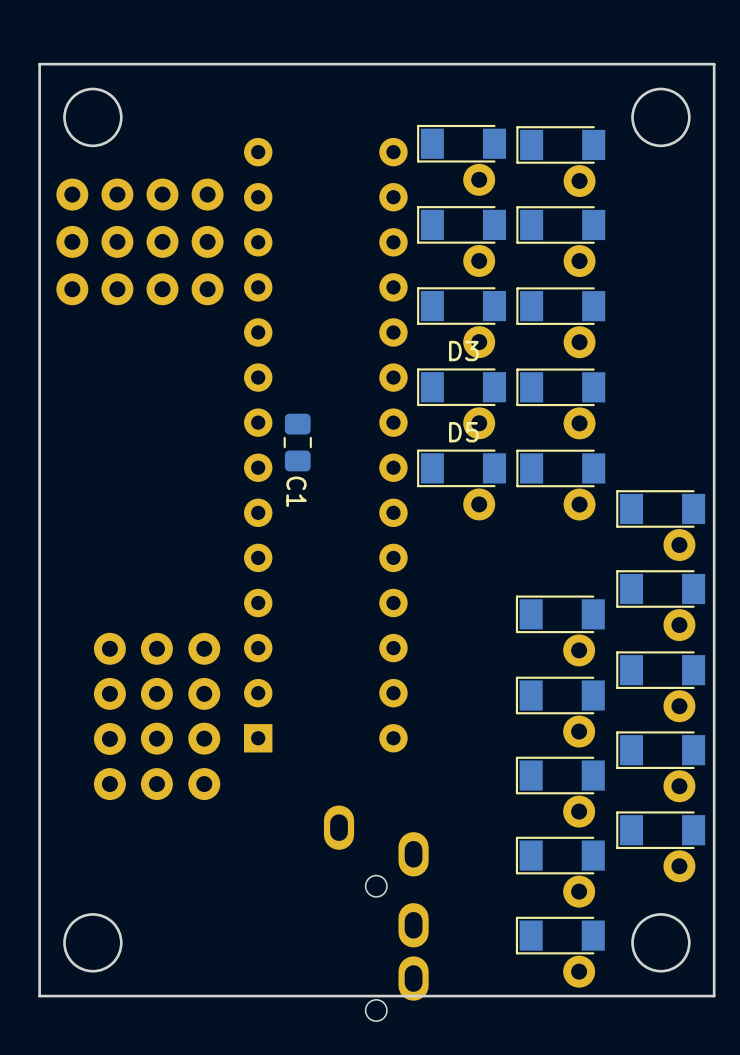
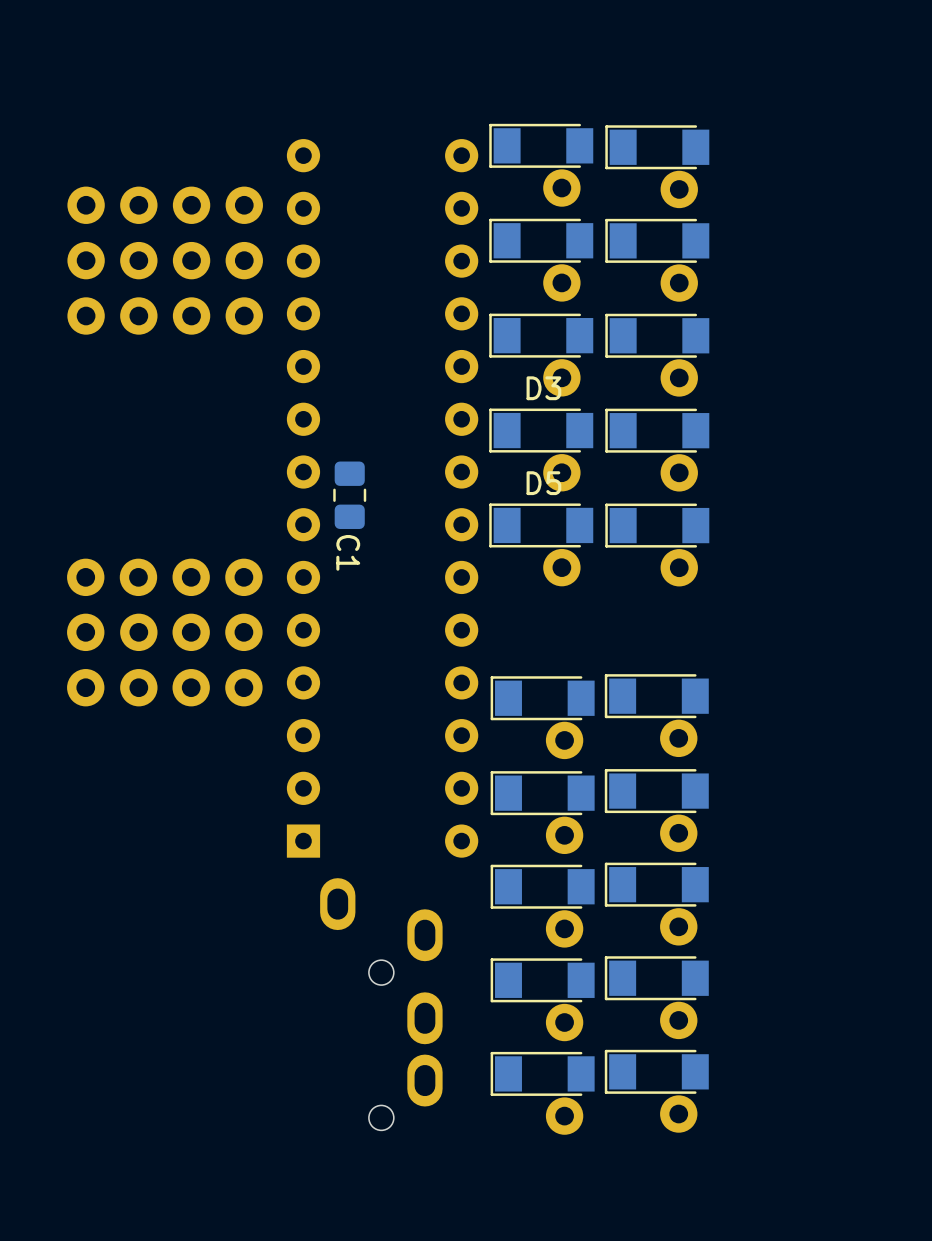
board edge: (714, 64) (39, 64) (39, 996) (714, 996) (714, 64) -> none
round board edge: [63, 87, 123, 148] -> none
round board edge: [631, 87, 691, 148] -> none
part: (660, 508) -> none
part: none -> (85, 577)
part: none -> (138, 577)
part: none -> (191, 577)
part: none -> (243, 577)
part: (679, 545) -> none
part: none -> (85, 632)
part: none -> (138, 632)
part: none -> (191, 632)
part: none -> (243, 632)
part: (660, 588) -> none
part: none -> (85, 687)
part: none -> (138, 687)
part: none -> (191, 687)
part: none -> (243, 687)
part: none -> (542, 698)
part: (679, 625) -> none
part: (109, 648) -> none
part: (156, 648) -> none
part: (204, 648) -> none
part: none -> (564, 740)
part: (660, 670) -> none
part: (109, 693) -> none
part: (156, 693) -> none
part: (204, 693) -> none
part: none -> (542, 793)
part: (679, 706) -> none
part: none -> (564, 835)
part: (109, 738) -> none
part: (156, 738) -> none
part: (204, 738) -> none
part: (660, 750) -> none
part: none -> (542, 886)
part: (109, 784) -> none
part: (156, 784) -> none
part: (204, 784) -> none
part: (679, 786) -> none
part: none -> (564, 928)
part: (660, 830) -> none
part: none -> (542, 980)
part: (679, 866) -> none
part: none -> (564, 1022)
round board edge: [63, 913, 123, 973] -> none
part position: (376, 913) -> (381, 1004)
round board edge: [631, 913, 691, 973] -> none
part: none -> (542, 1073)
part: none -> (564, 1116)

